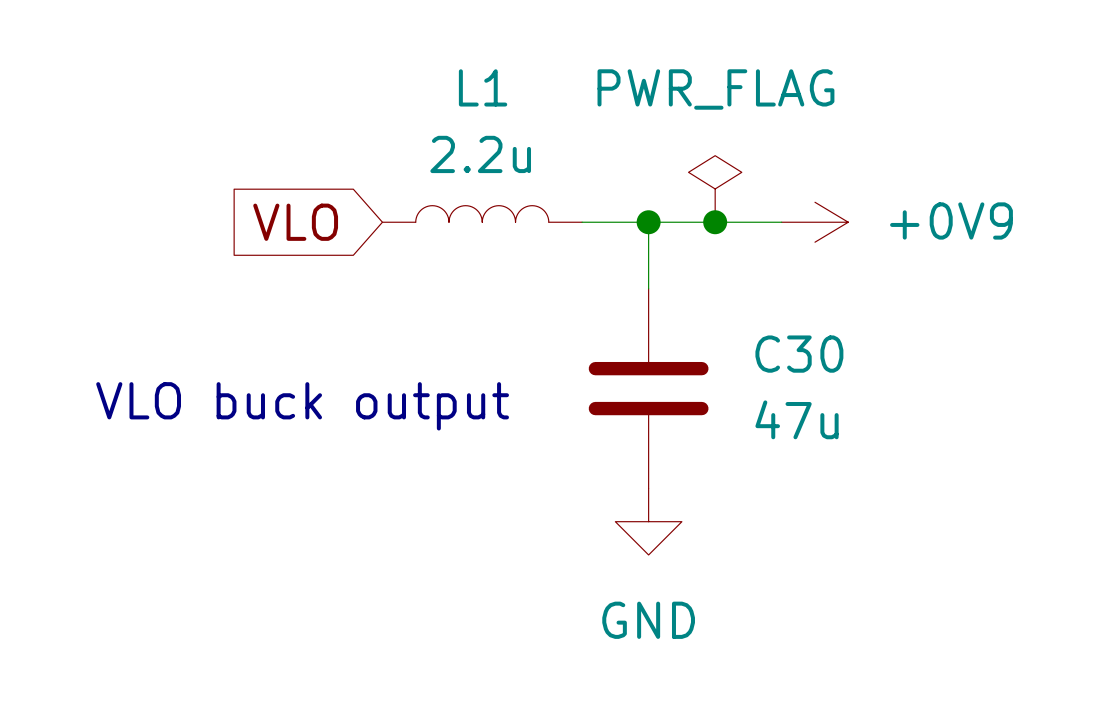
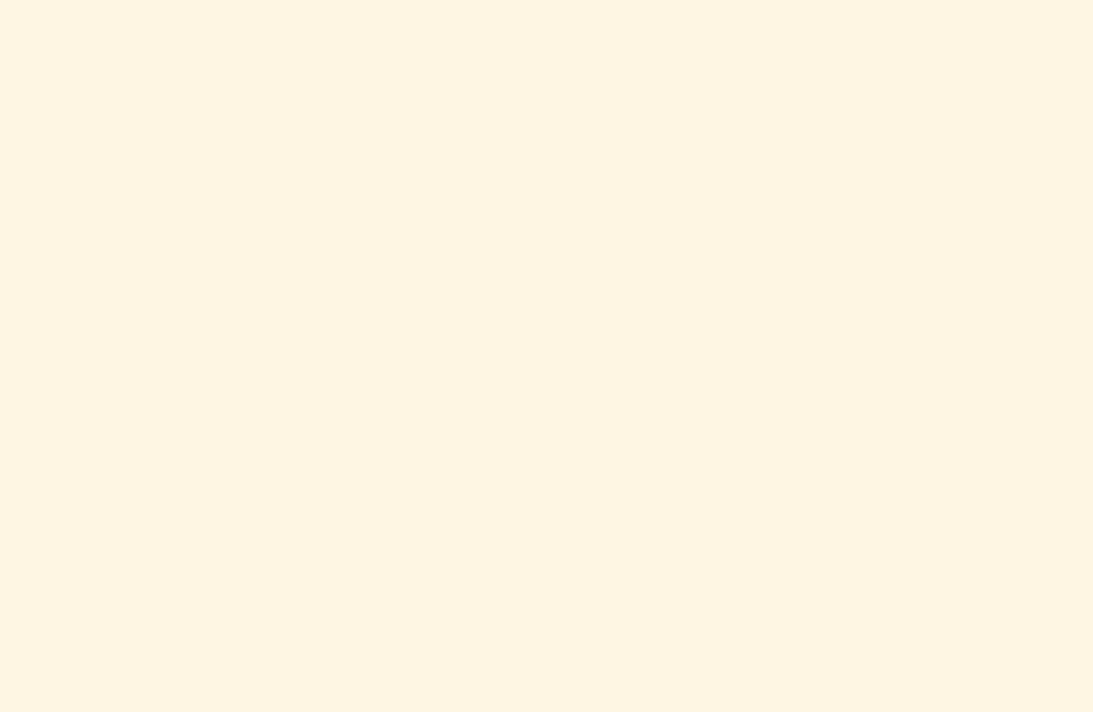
power symbol: PWR_FLAG (715, 188) -> none
L1: 2.2u (482, 213) -> none
global label: VLO (295, 222) -> none
wire: (582, 222) (781, 222) -> none
wire: (648, 222) (648, 288) -> none
junction: (648, 222) -> none
junction: (715, 222) -> none
power symbol: +0V9 (814, 222) -> none
C30: 47u (648, 388) -> none
text: VLO buck output (302, 406) -> none
power symbol: GND (648, 521) -> none

